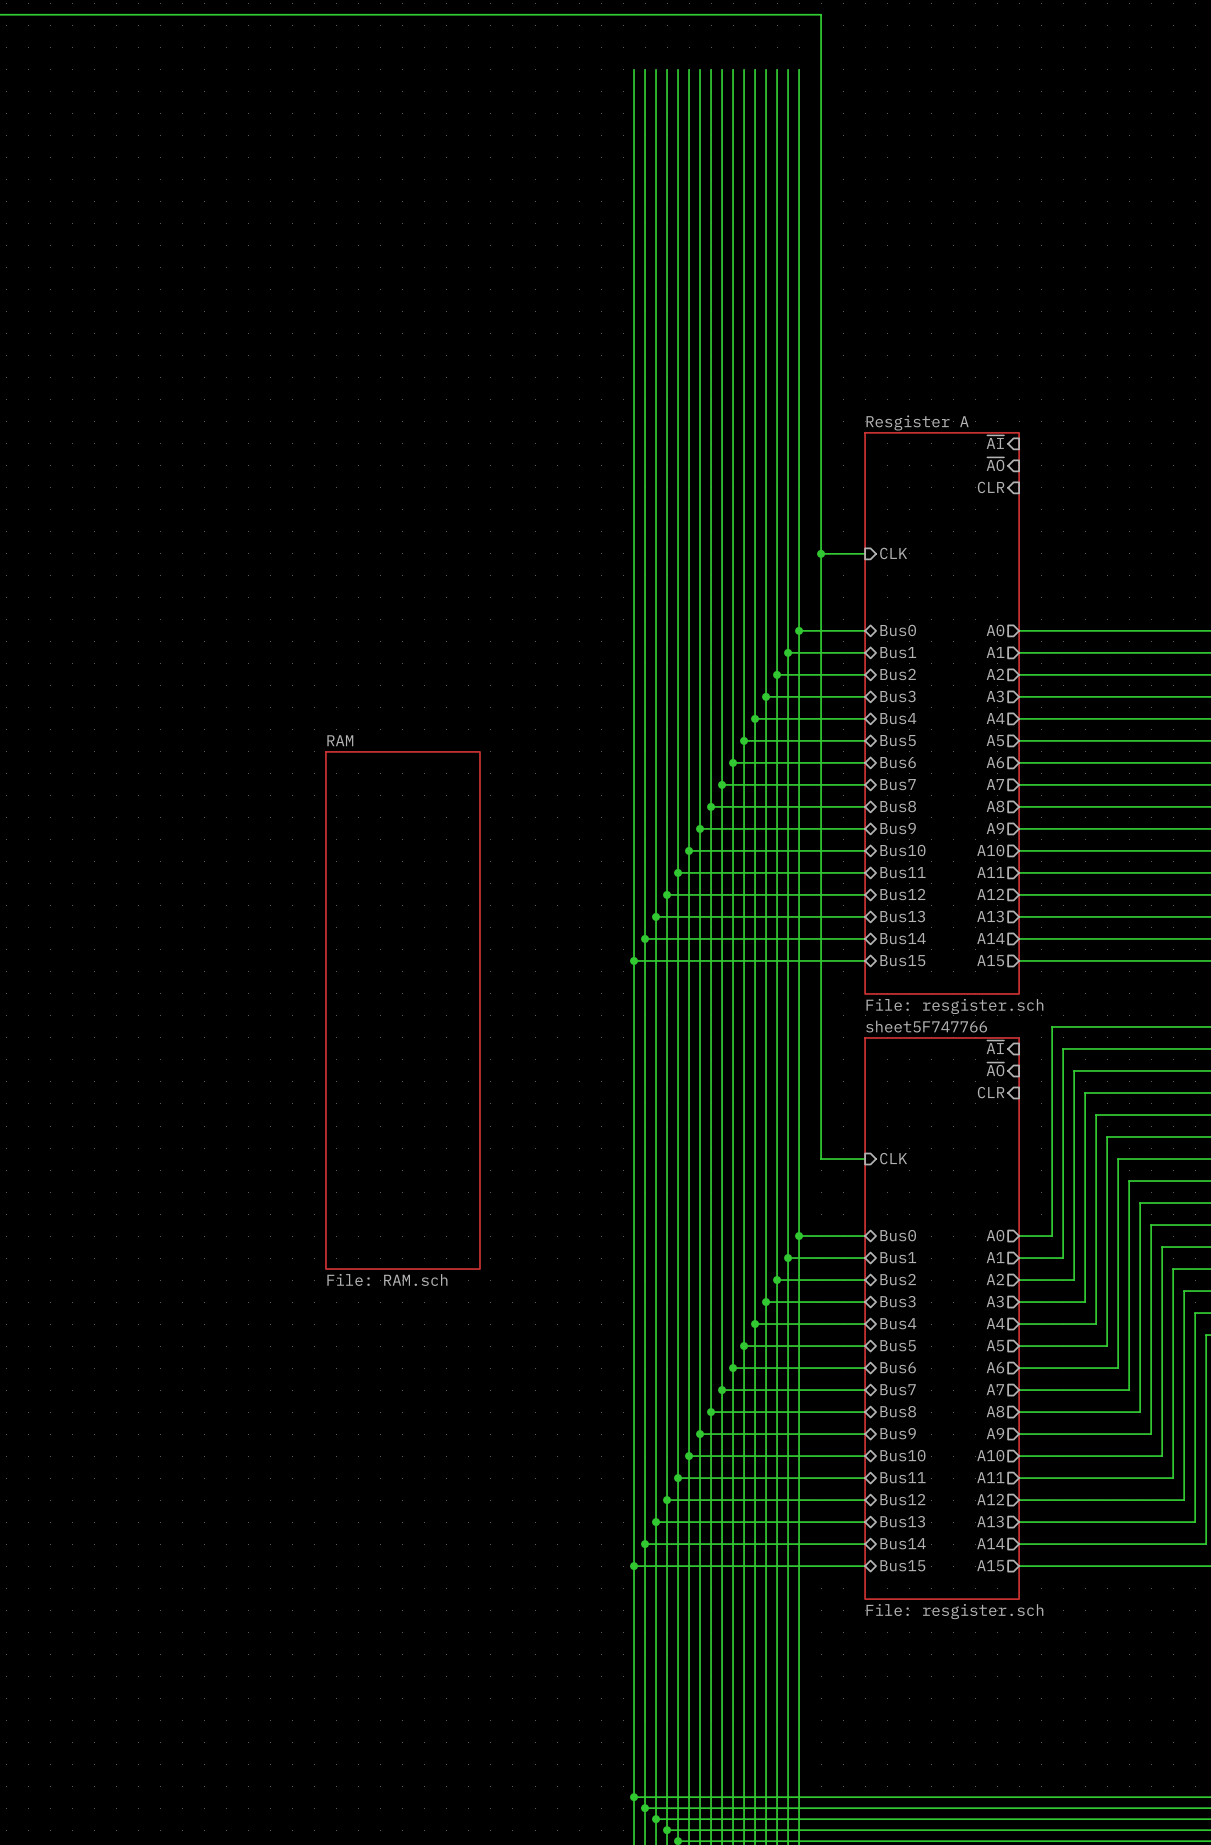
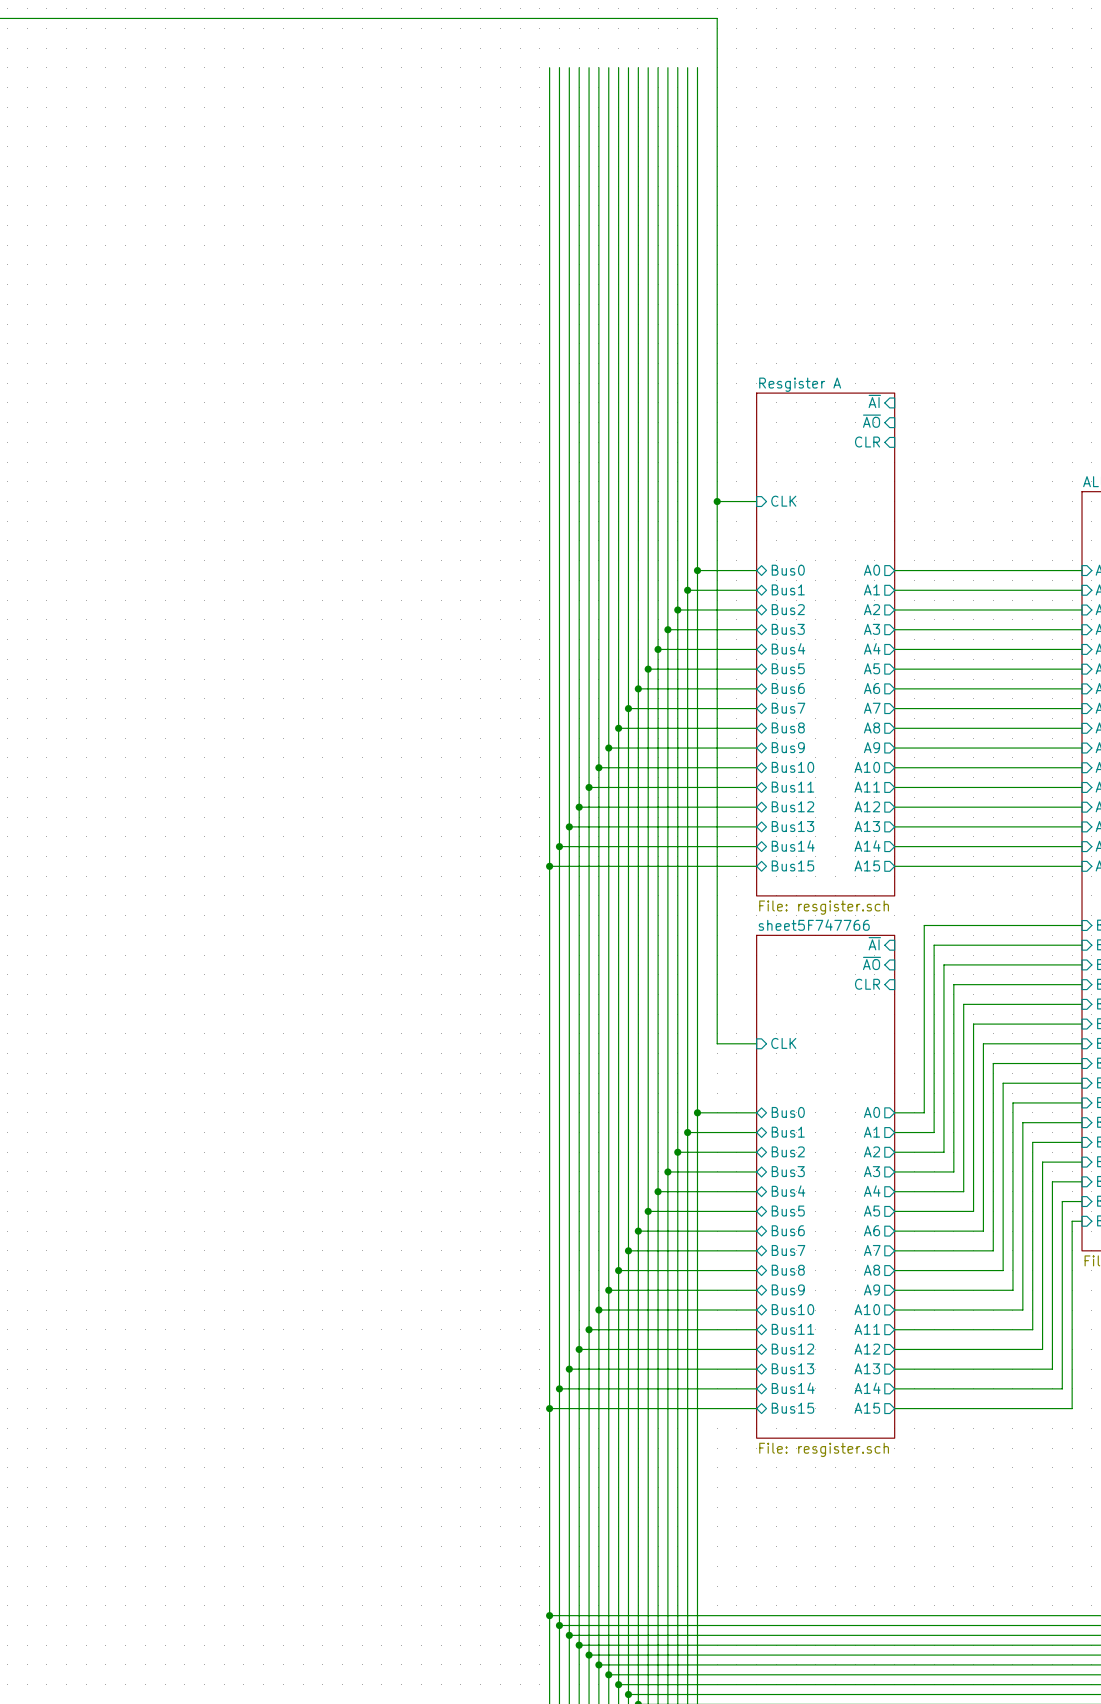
sheet RAM: File: RAM.sch (402, 1010) -> none

